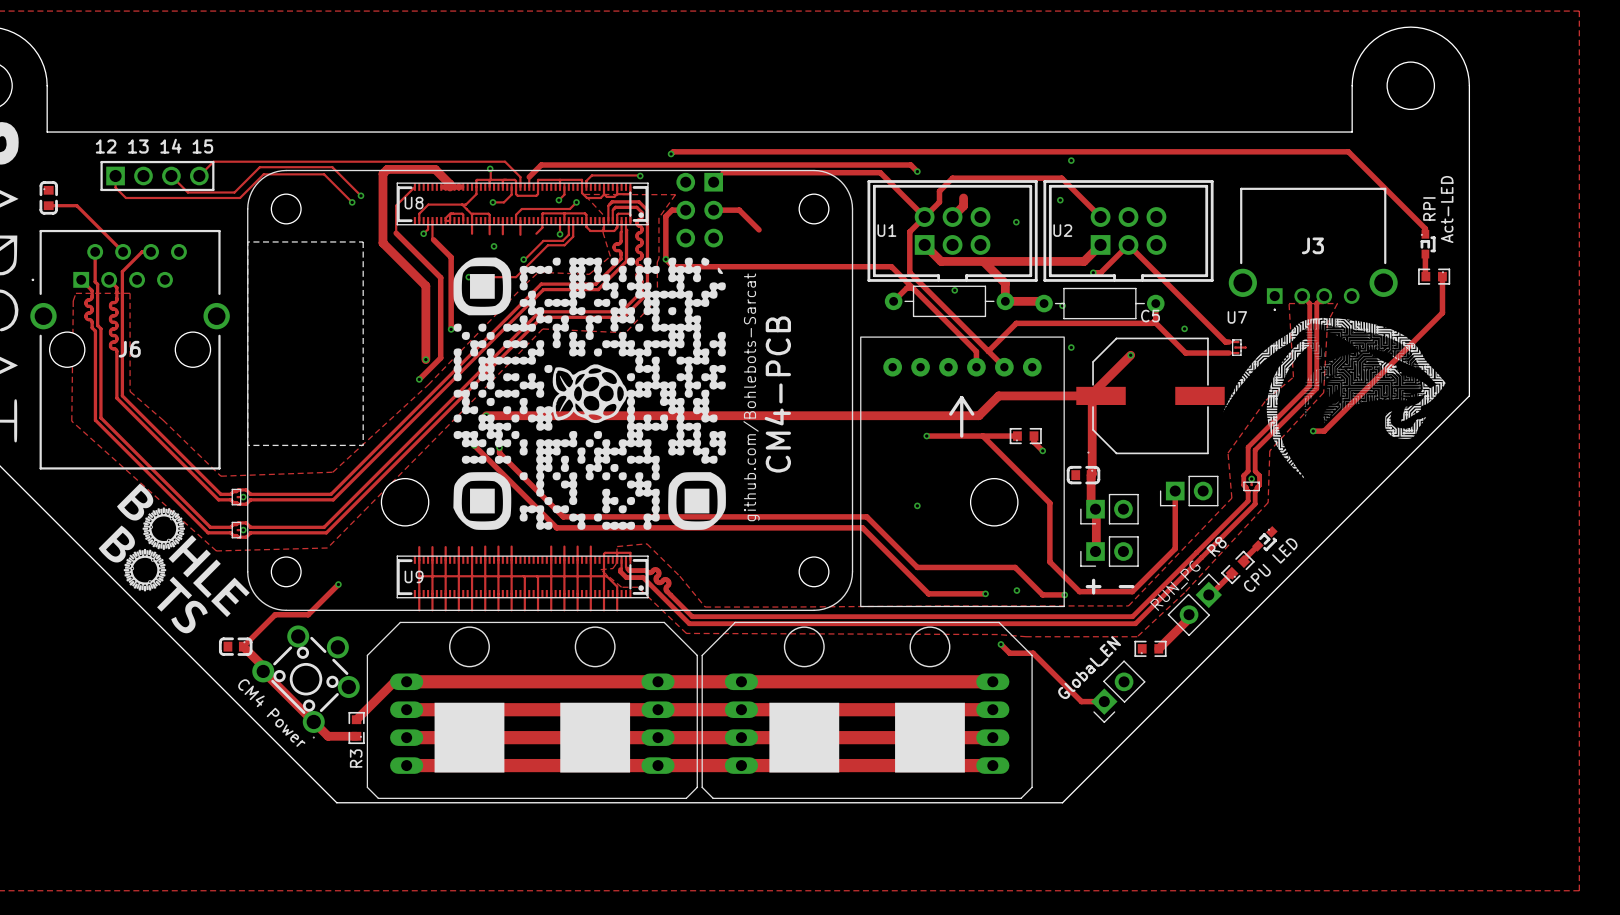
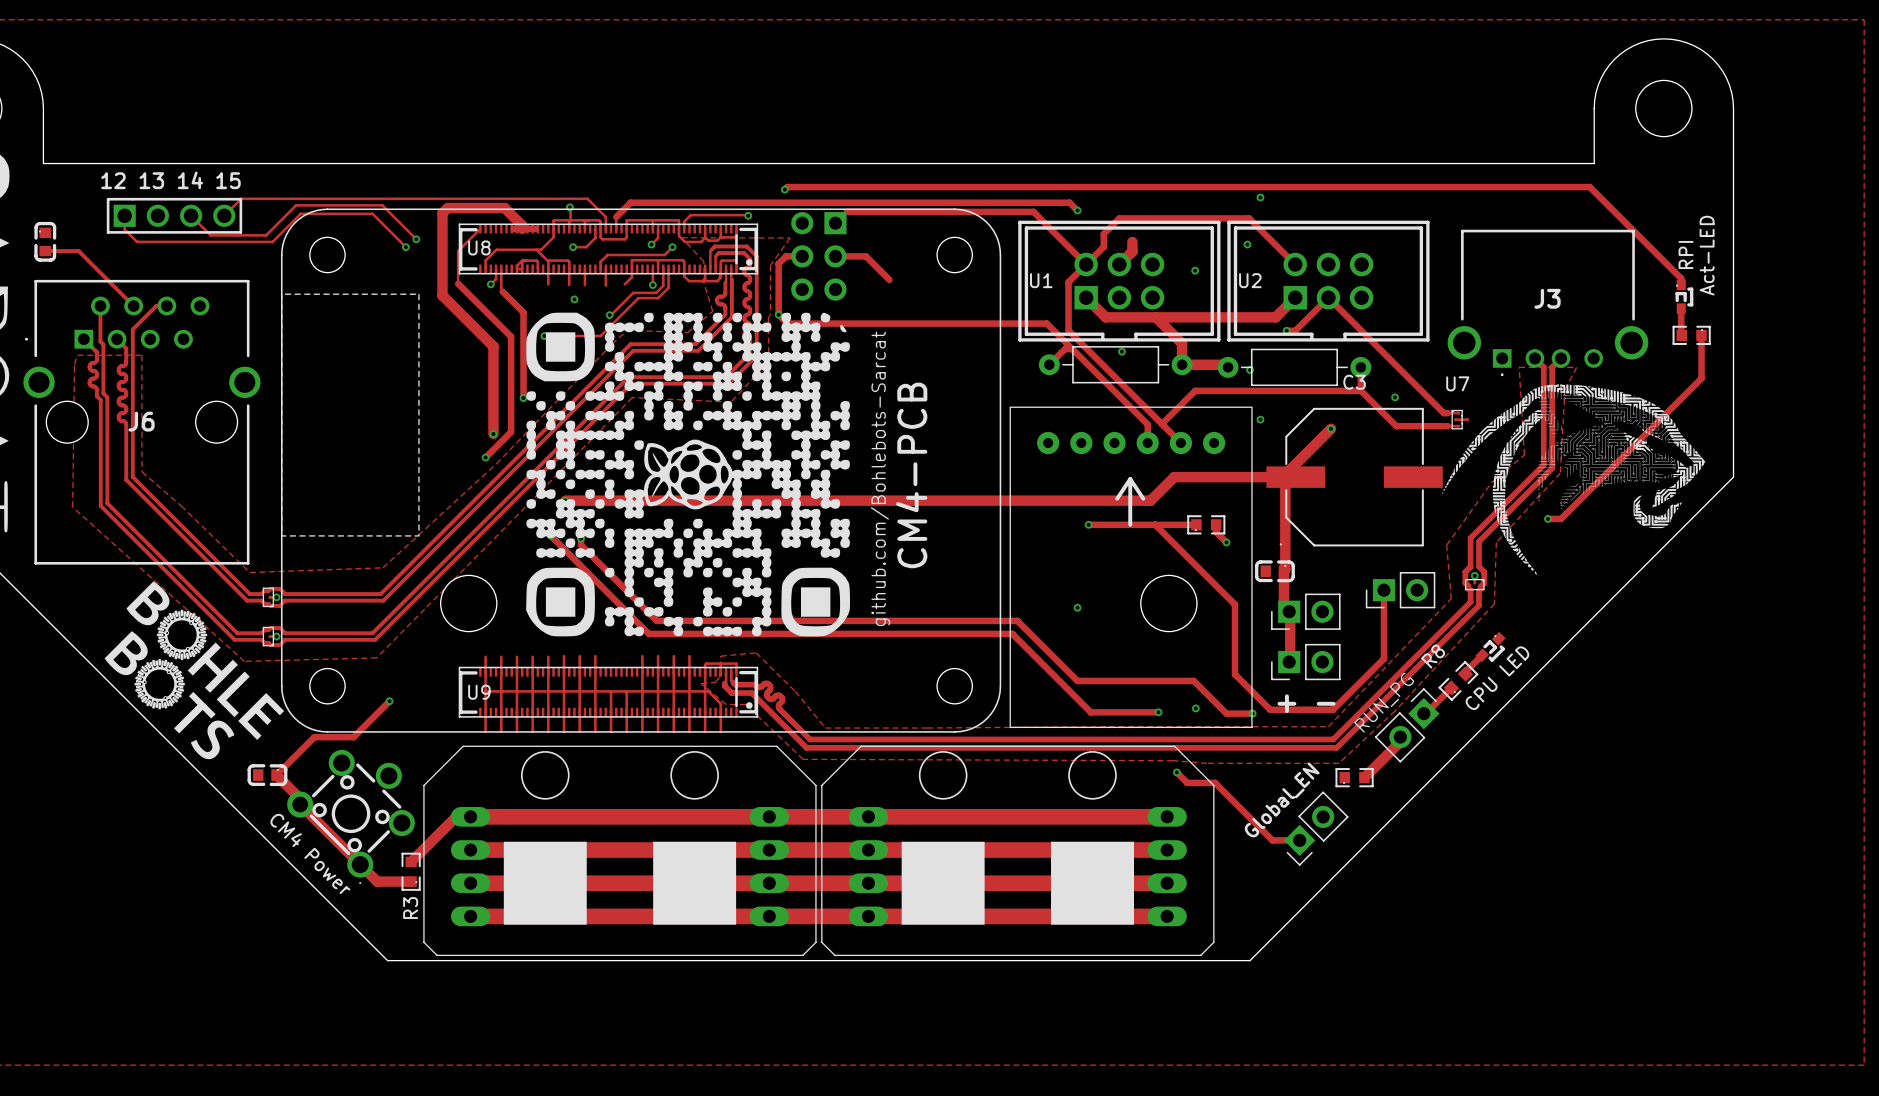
C5 name: C5 (1150, 316) -> C3 (1354, 382)

